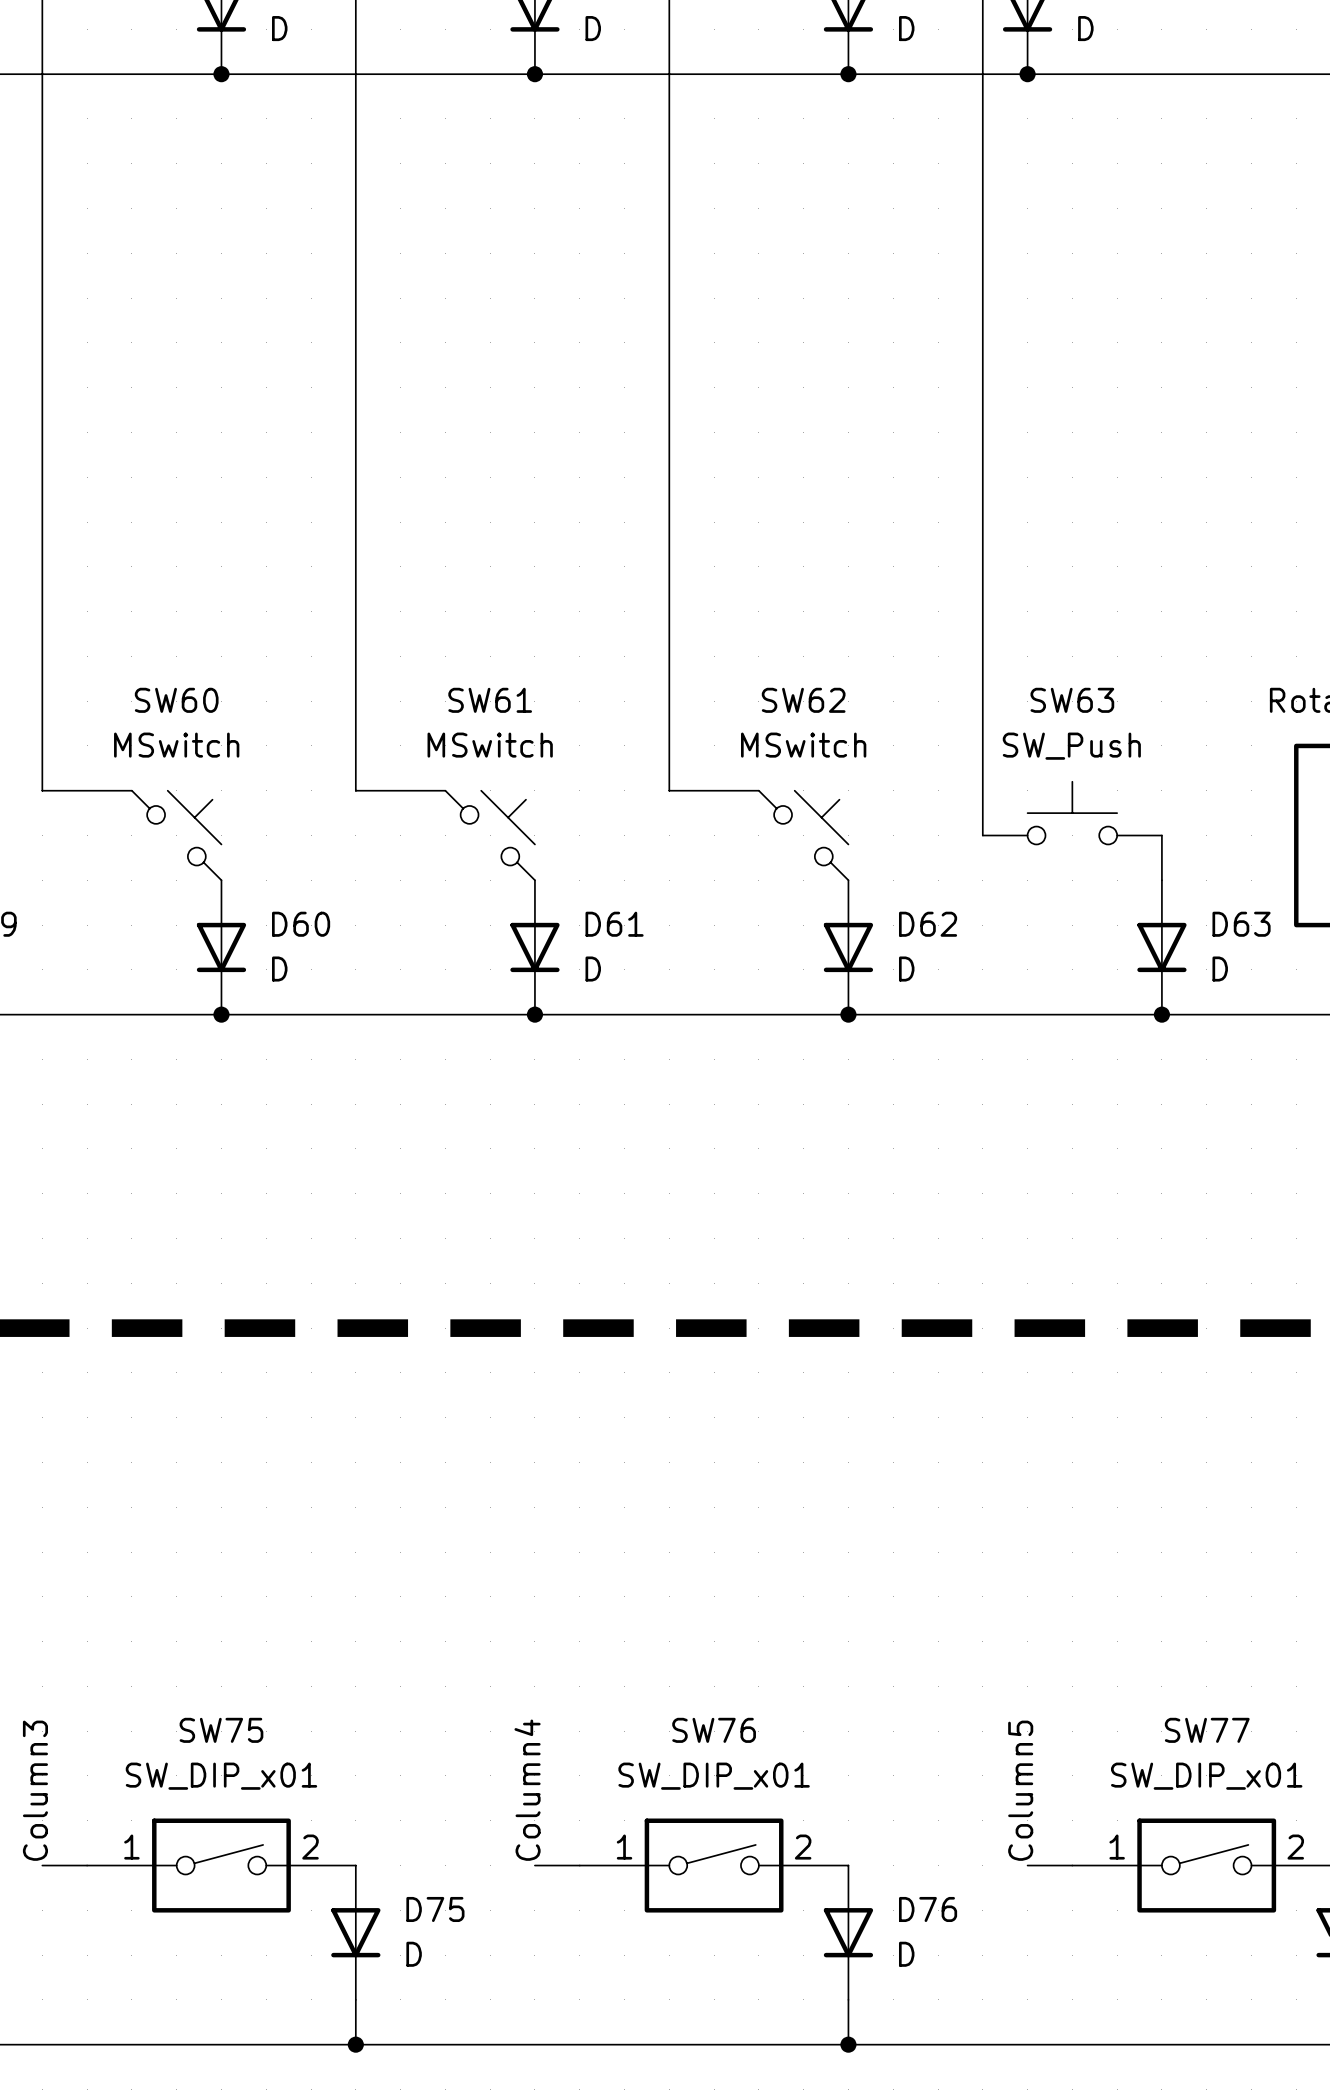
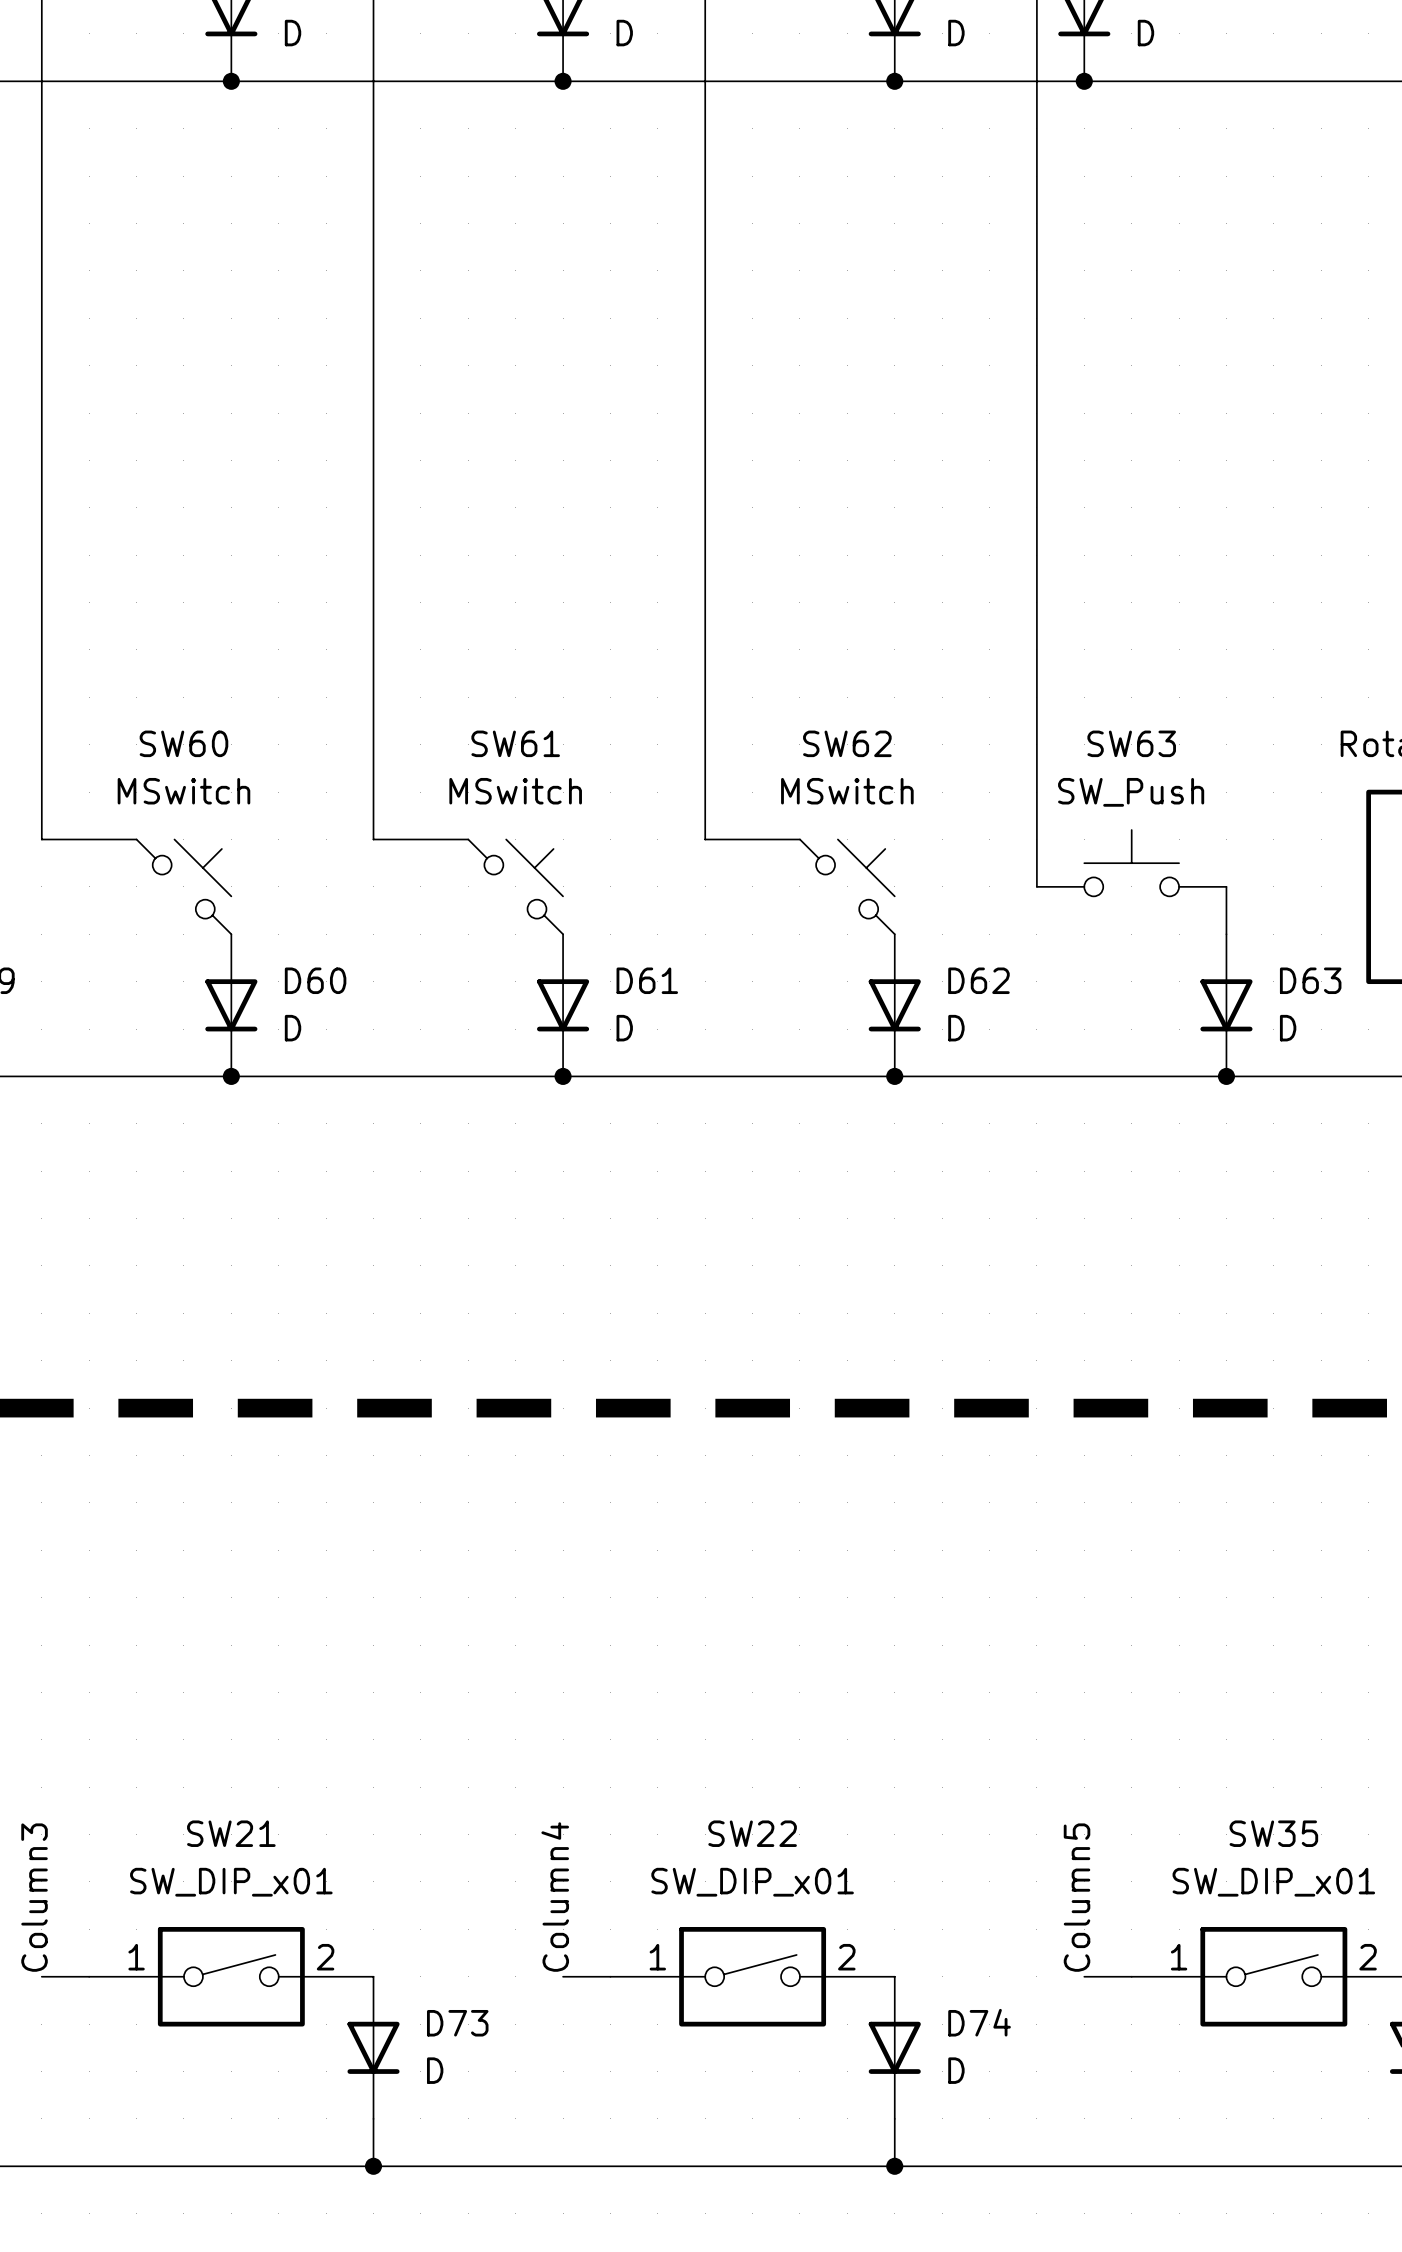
SW75 name: SW75 (221, 1730) -> SW21 (231, 1833)
SW76 name: SW76 (714, 1730) -> SW22 (752, 1833)
SW77 name: SW77 (1207, 1730) -> SW35 (1273, 1833)
D75 name: D75 (435, 1909) -> D73 (457, 2023)
D76 name: D76 (928, 1909) -> D74 (979, 2022)

